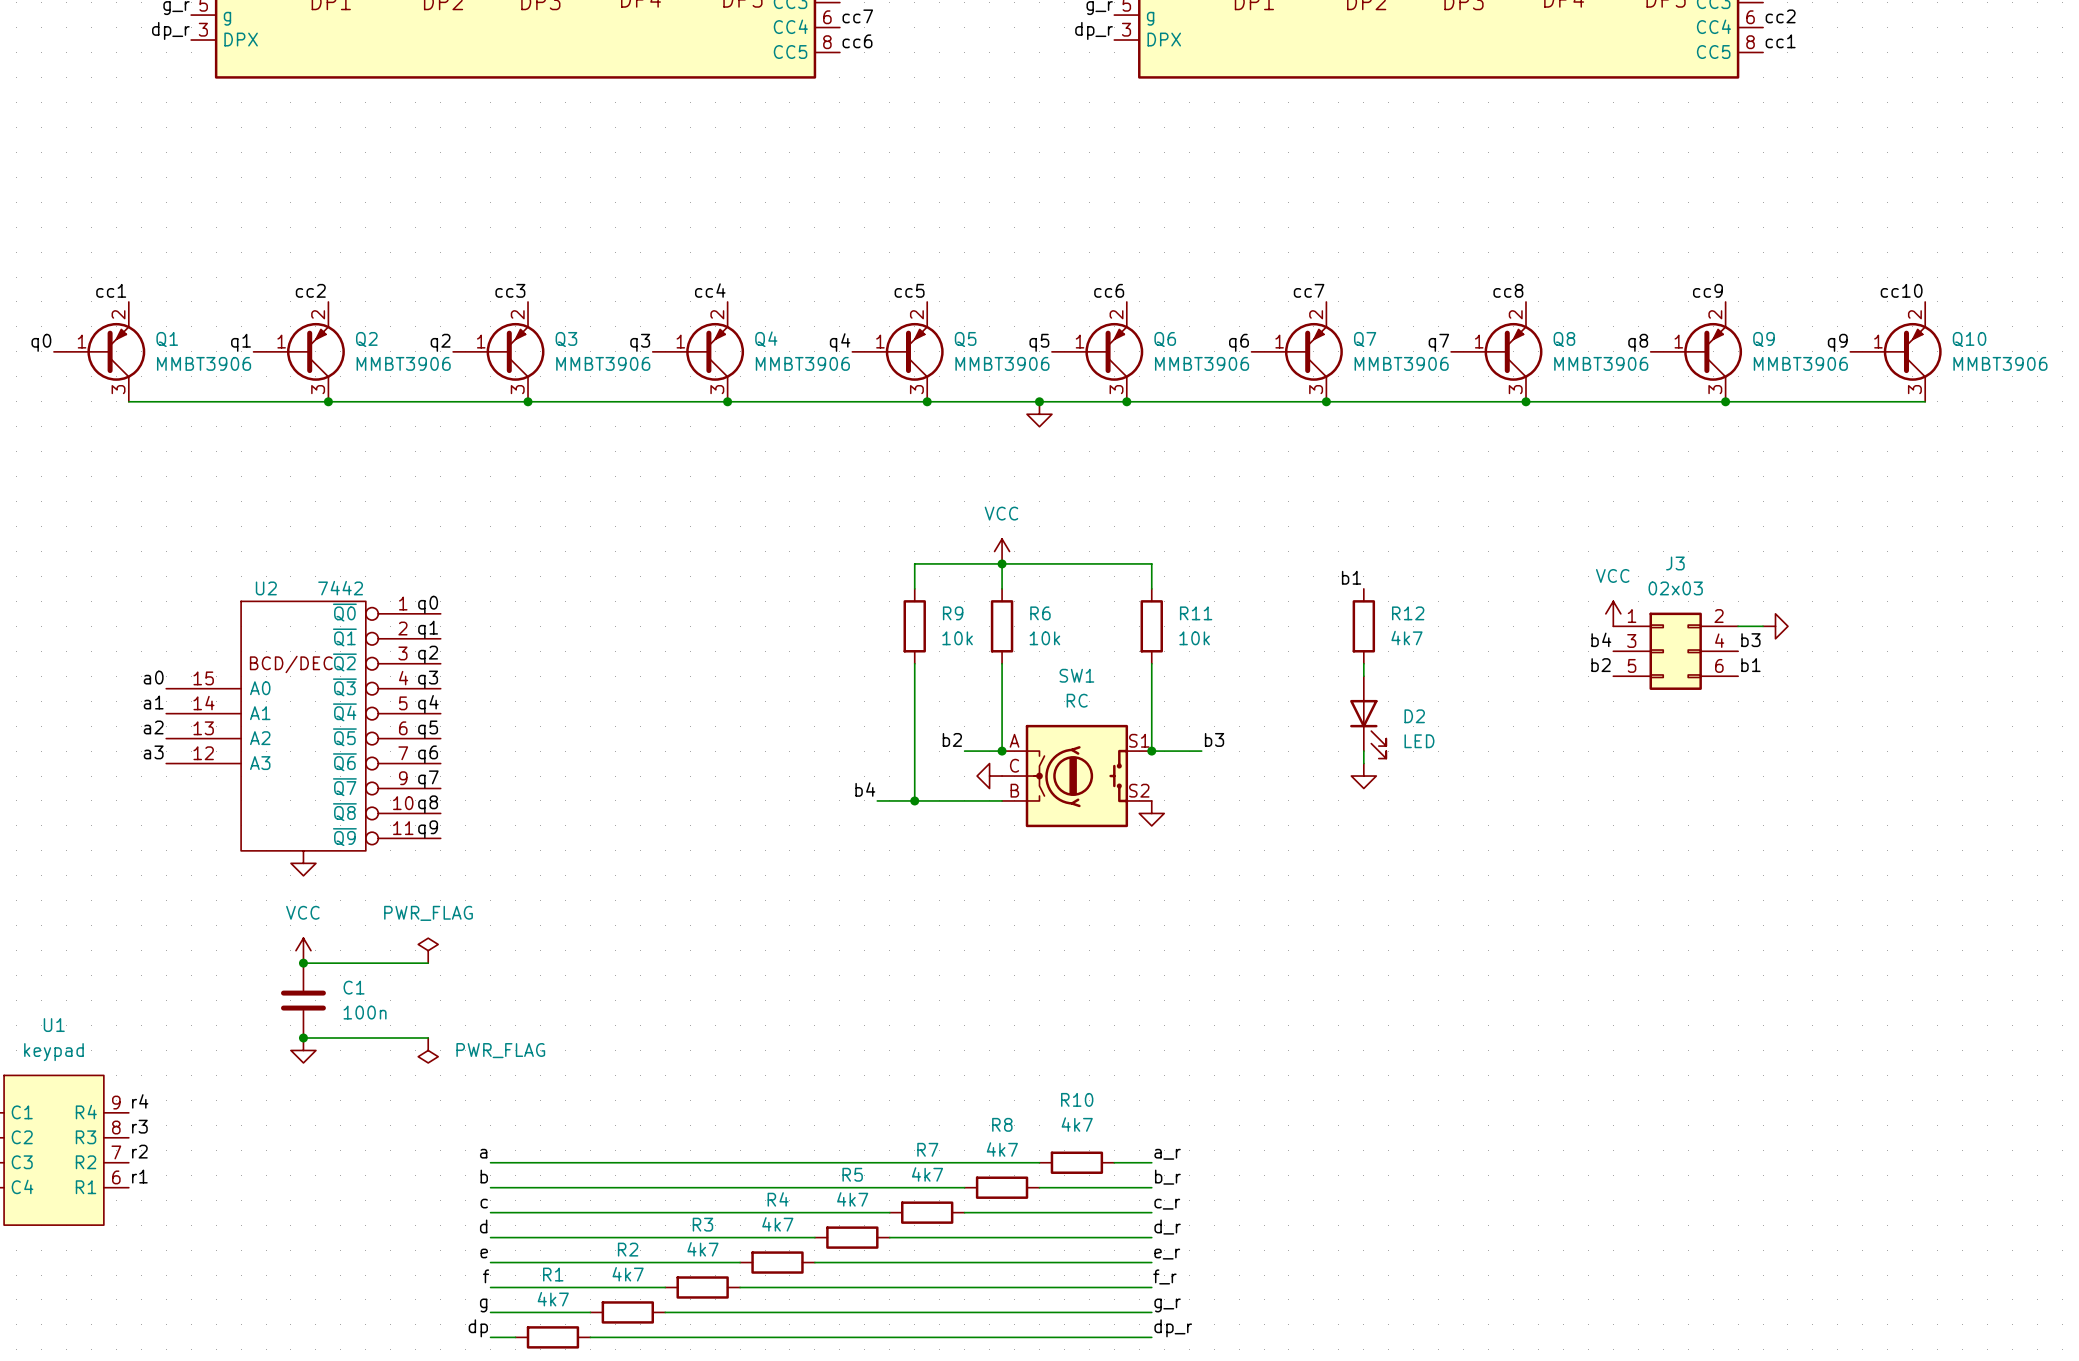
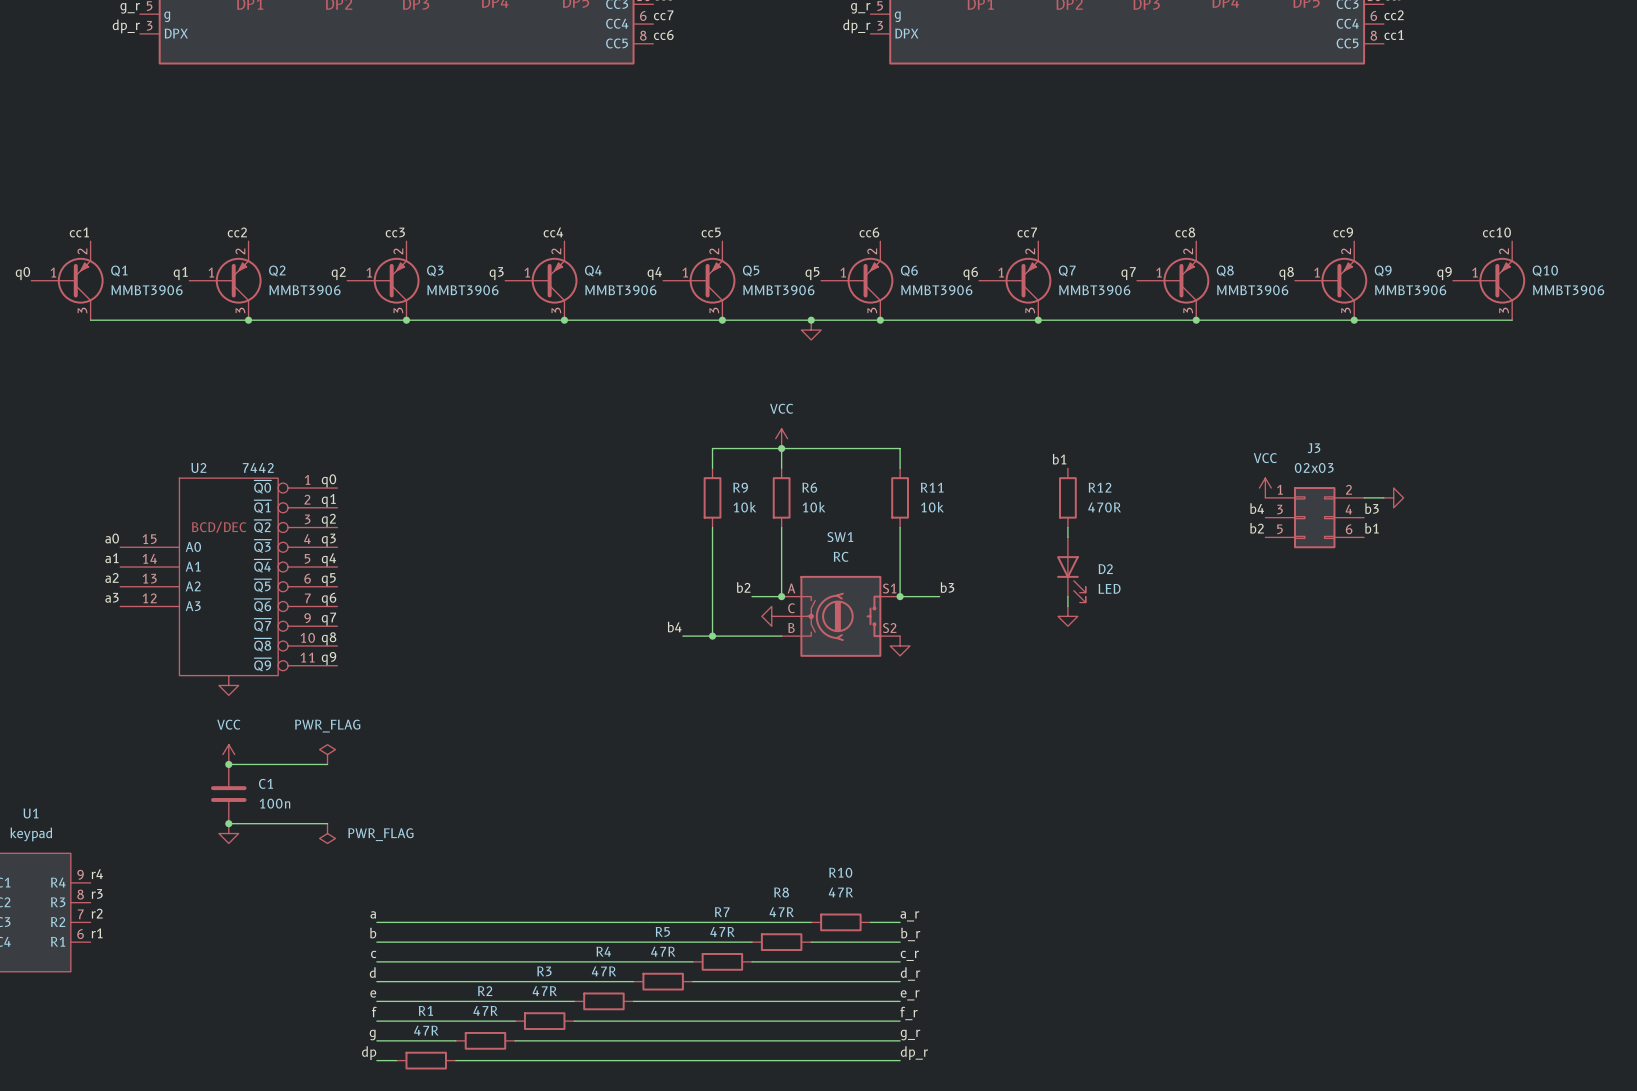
R12 value: 4k7 (1406, 638) -> 470R (1104, 507)
R10 value: 4k7 (1077, 1124) -> 47R (840, 892)
R8 value: 4k7 (1002, 1149) -> 47R (781, 912)
R7 value: 4k7 (927, 1174) -> 47R (722, 931)
R5 value: 4k7 (852, 1199) -> 47R (663, 951)
R4 value: 4k7 (777, 1224) -> 47R (604, 971)
R3 value: 4k7 (702, 1249) -> 47R (544, 991)
R2 value: 4k7 (628, 1274) -> 47R (485, 1010)
R1 value: 4k7 (553, 1299) -> 47R (426, 1030)

